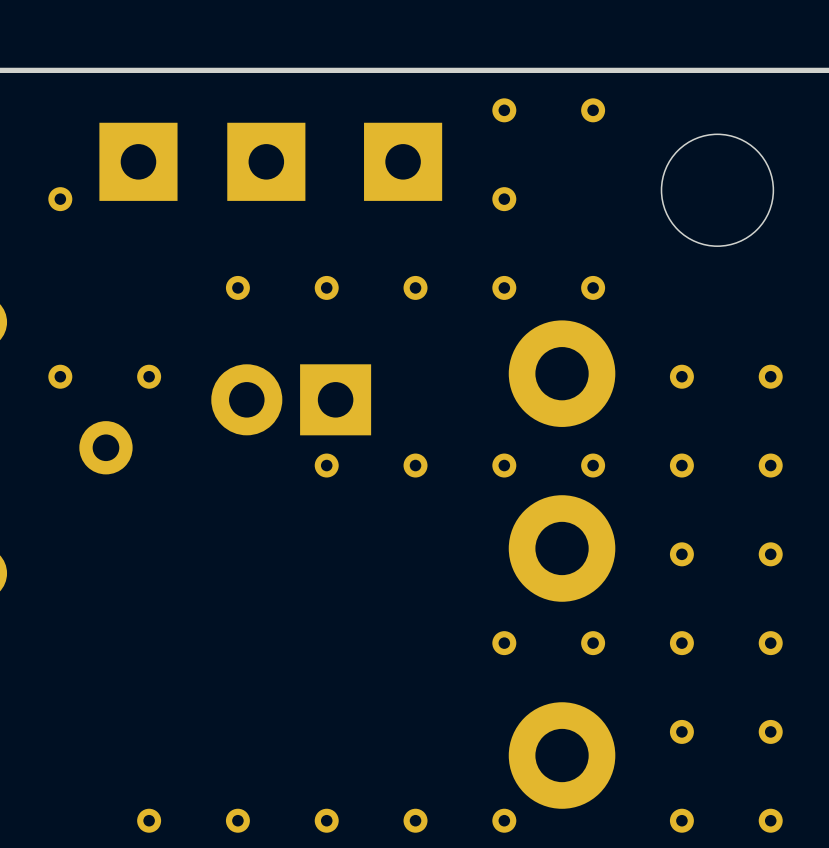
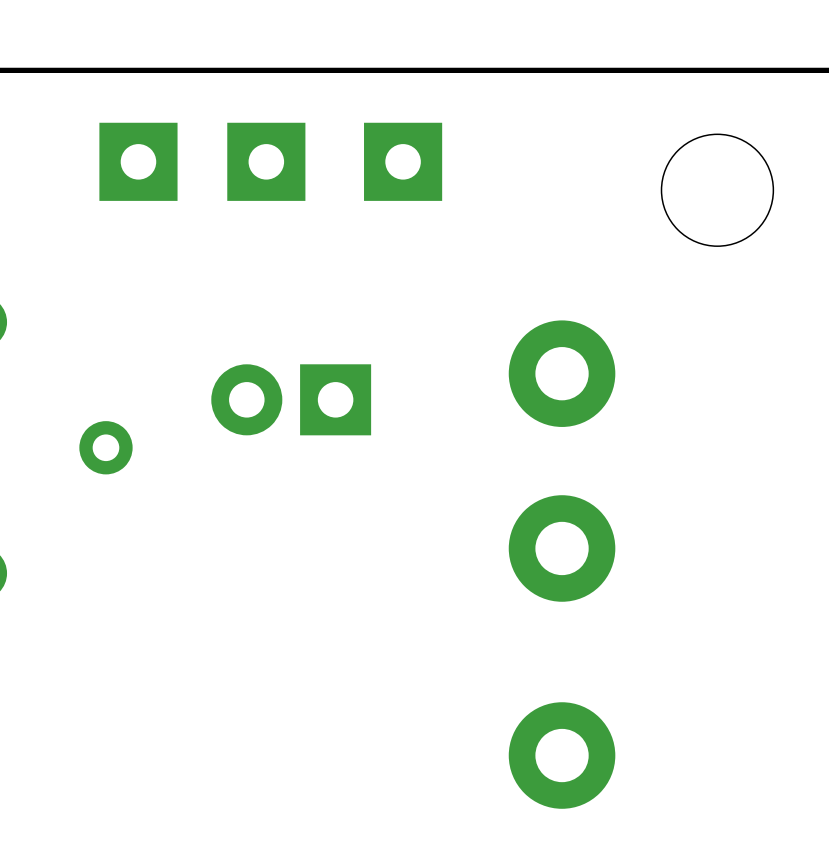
part: (504, 110) -> none
part: (593, 110) -> none
part: (60, 199) -> none
part: (504, 199) -> none
part: (237, 287) -> none
part: (326, 287) -> none
part: (415, 287) -> none
part: (504, 287) -> none
part: (593, 287) -> none
part: (60, 376) -> none
part: (149, 376) -> none
part: (681, 376) -> none
part: (770, 376) -> none
part: (326, 465) -> none
part: (415, 465) -> none
part: (504, 465) -> none
part: (593, 465) -> none
part: (681, 465) -> none
part: (770, 465) -> none
part: (681, 554) -> none
part: (770, 554) -> none
part: (504, 643) -> none
part: (593, 643) -> none
part: (681, 643) -> none
part: (770, 643) -> none
part: (681, 731) -> none
part: (770, 731) -> none
part: (149, 820) -> none
part: (237, 820) -> none
part: (326, 820) -> none
part: (415, 820) -> none
part: (504, 820) -> none
part: (681, 820) -> none
part: (770, 820) -> none

